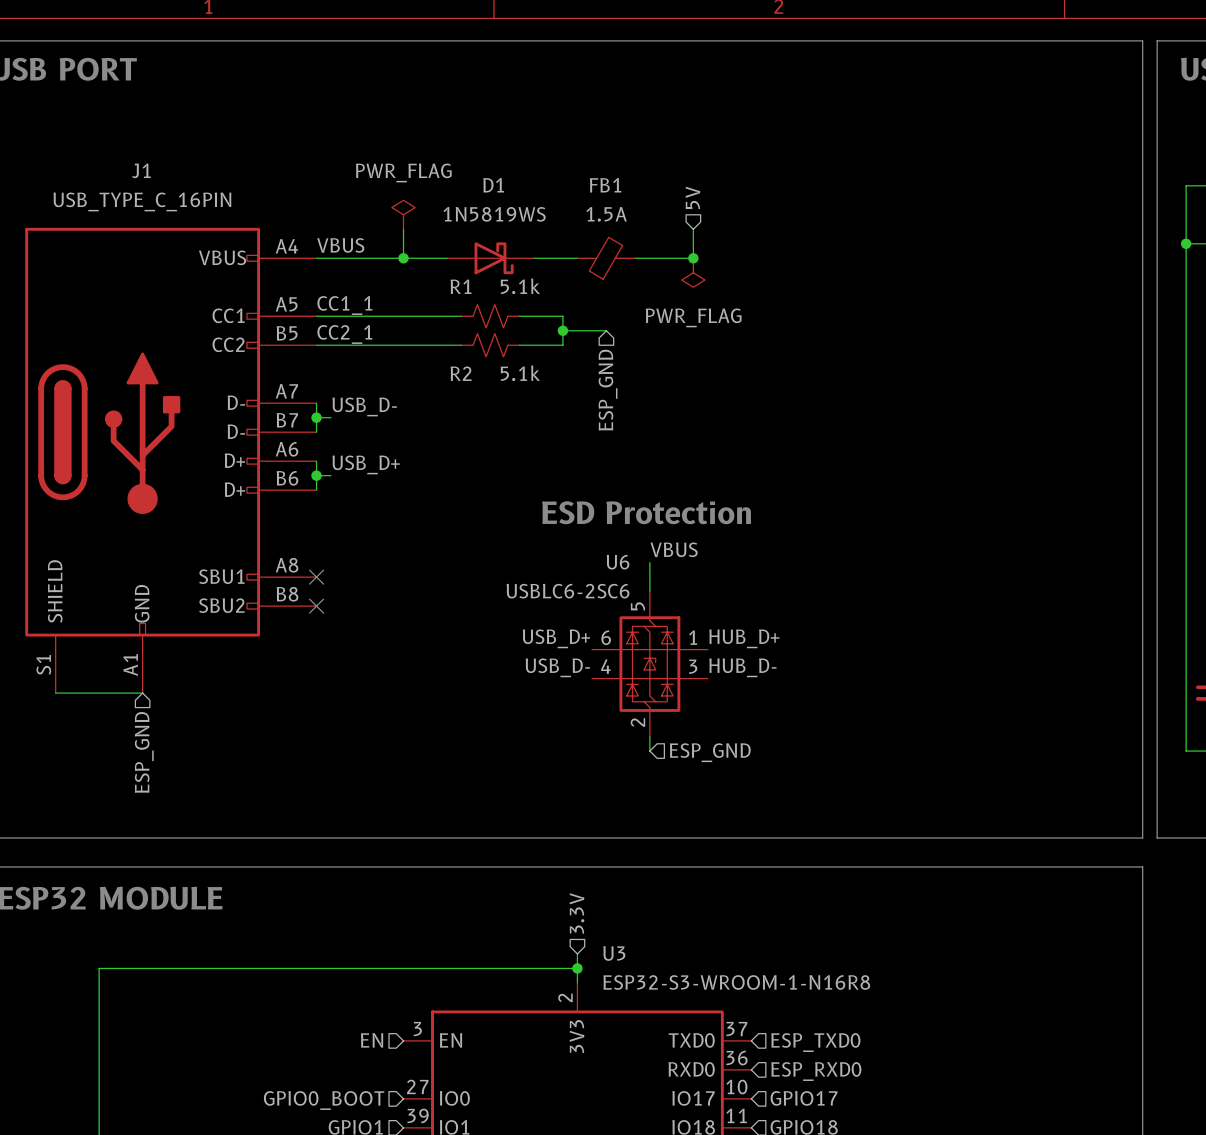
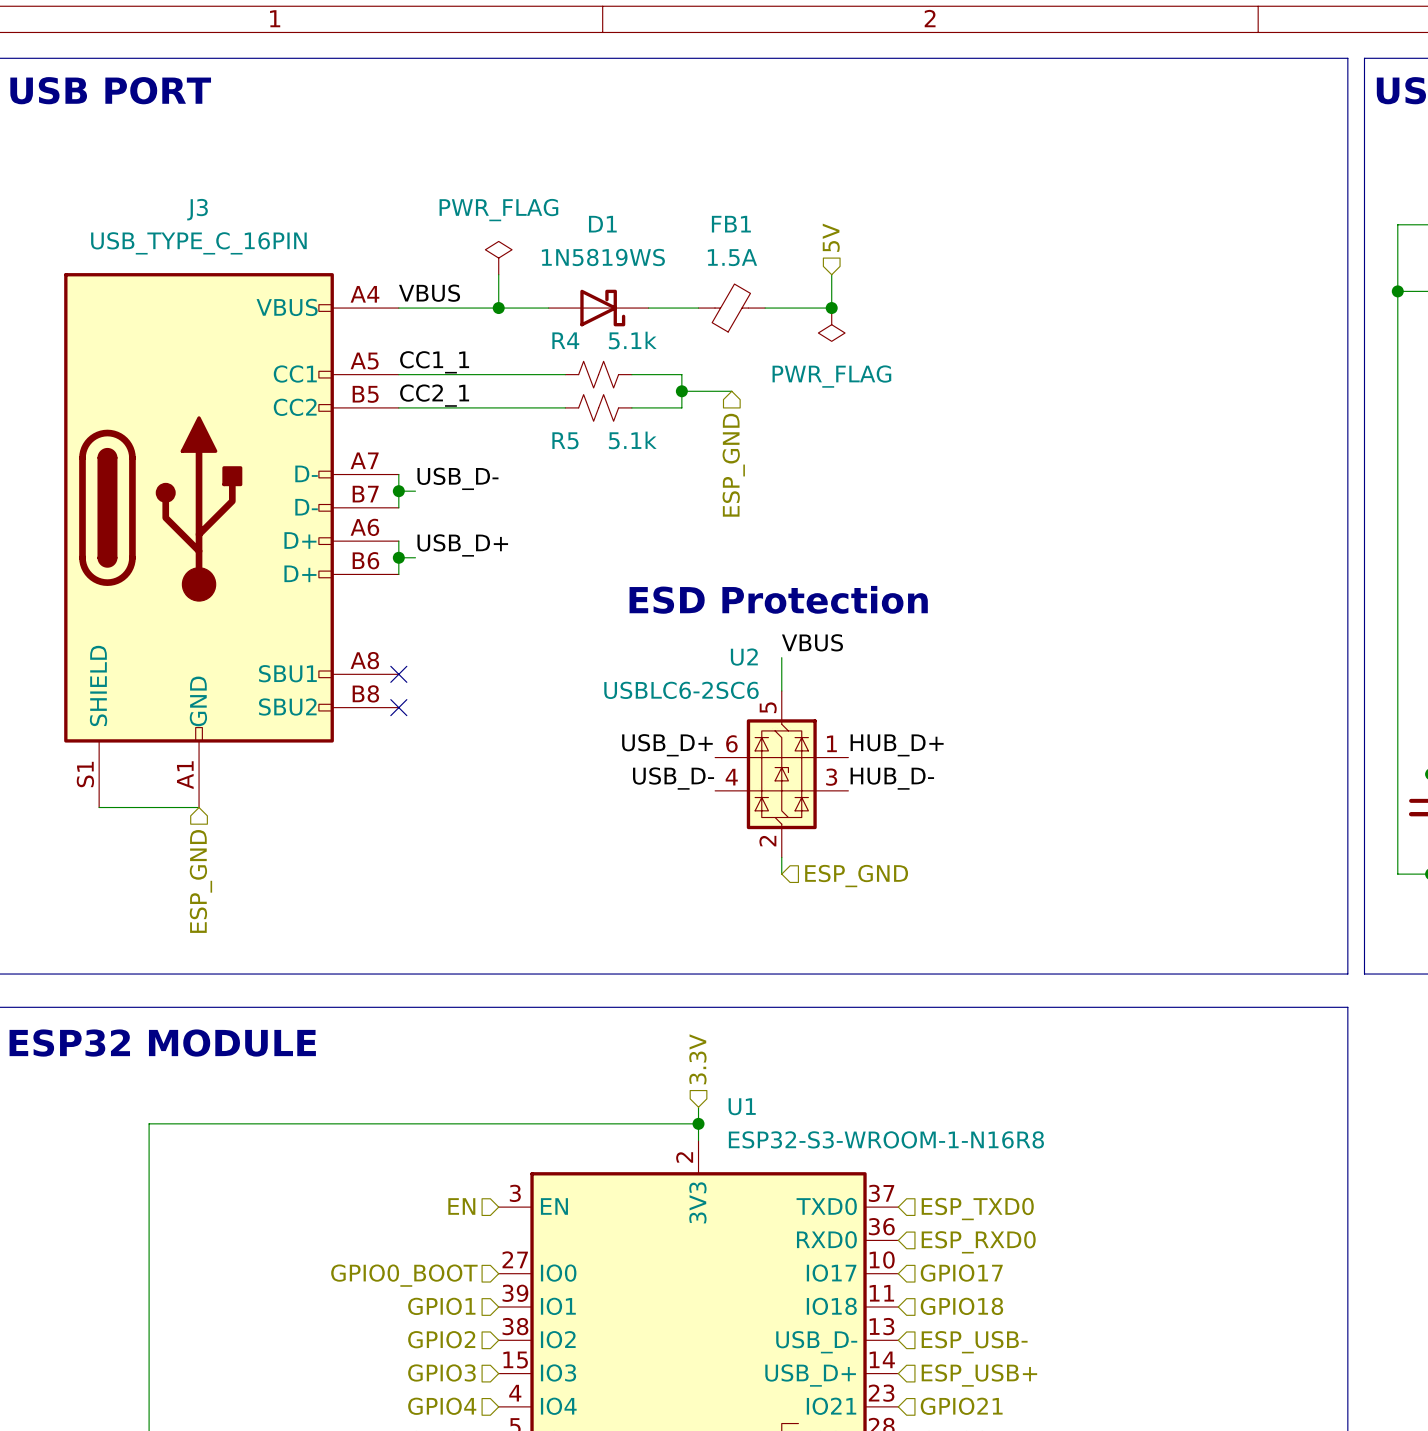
J1 name: J1 (141, 170) -> J3 (197, 209)
R1 name: R1 (461, 286) -> R4 (565, 340)
R2 name: R2 (461, 373) -> R5 (565, 440)
U6 name: U6 (618, 562) -> U2 (744, 657)
U3 name: U3 (614, 953) -> U1 (742, 1106)

